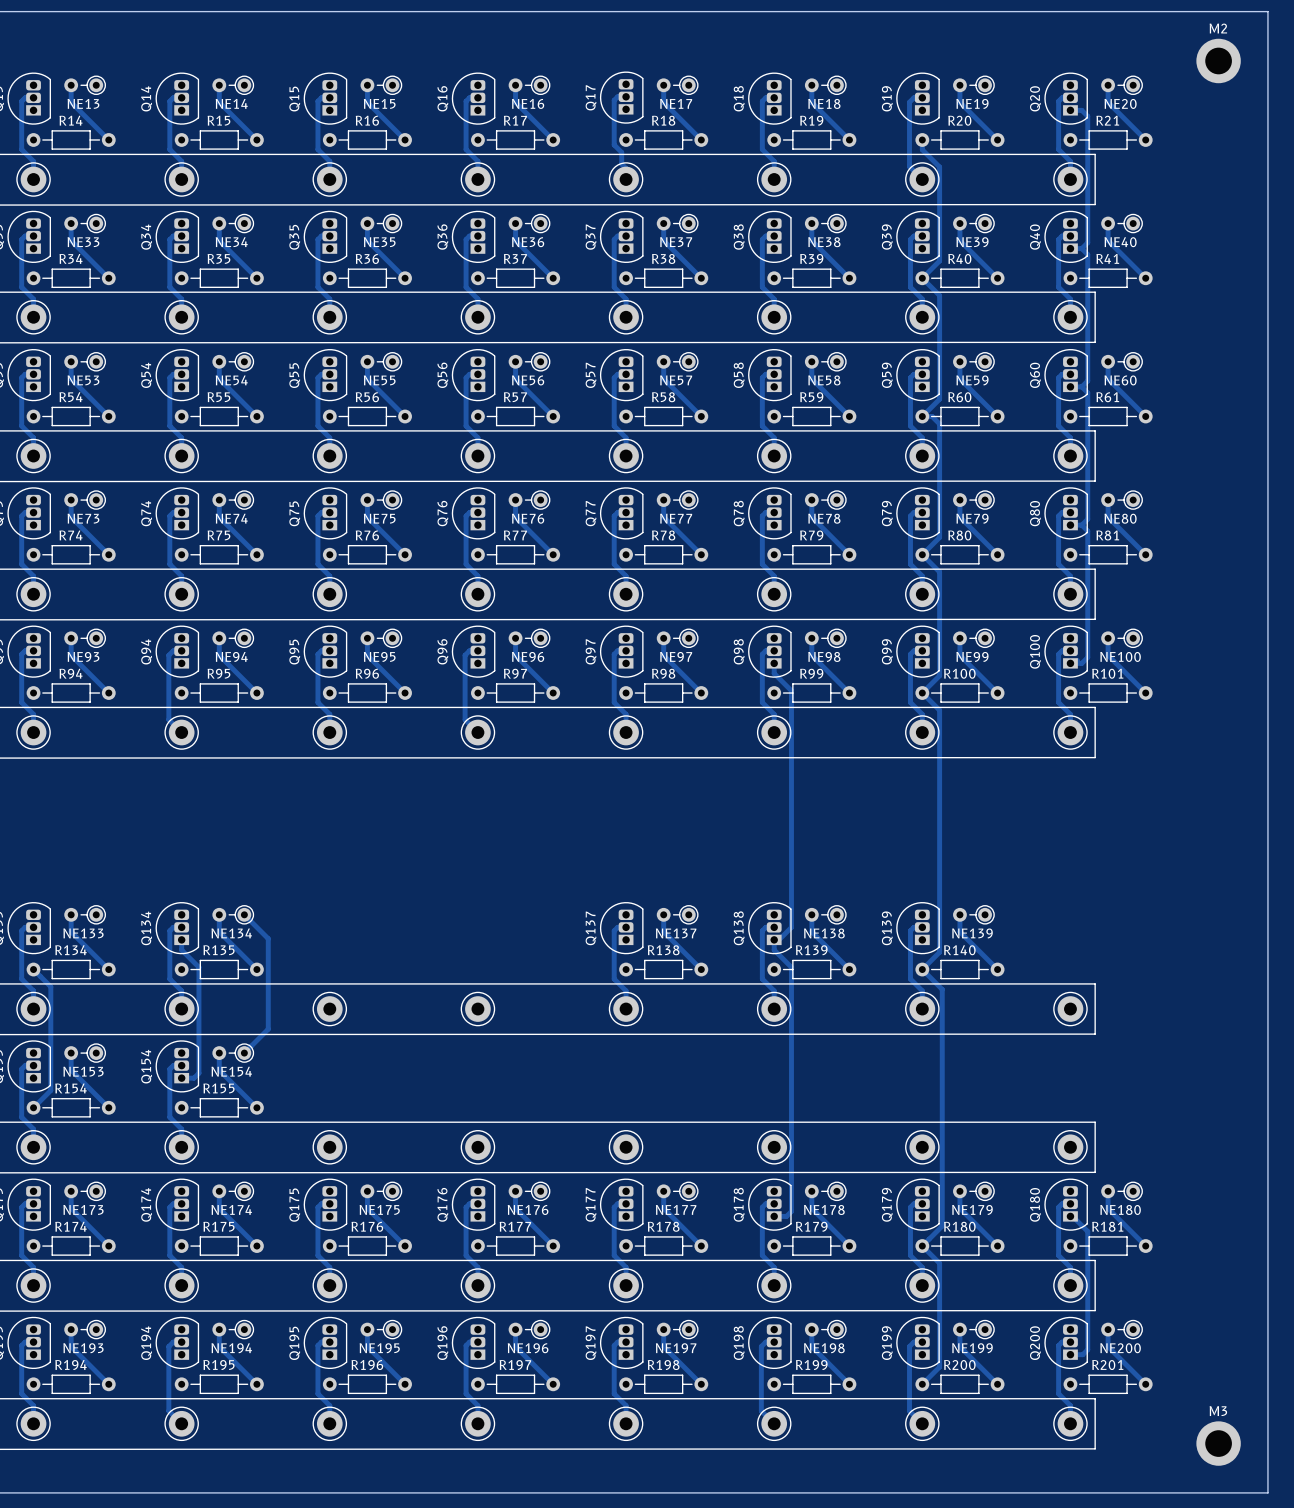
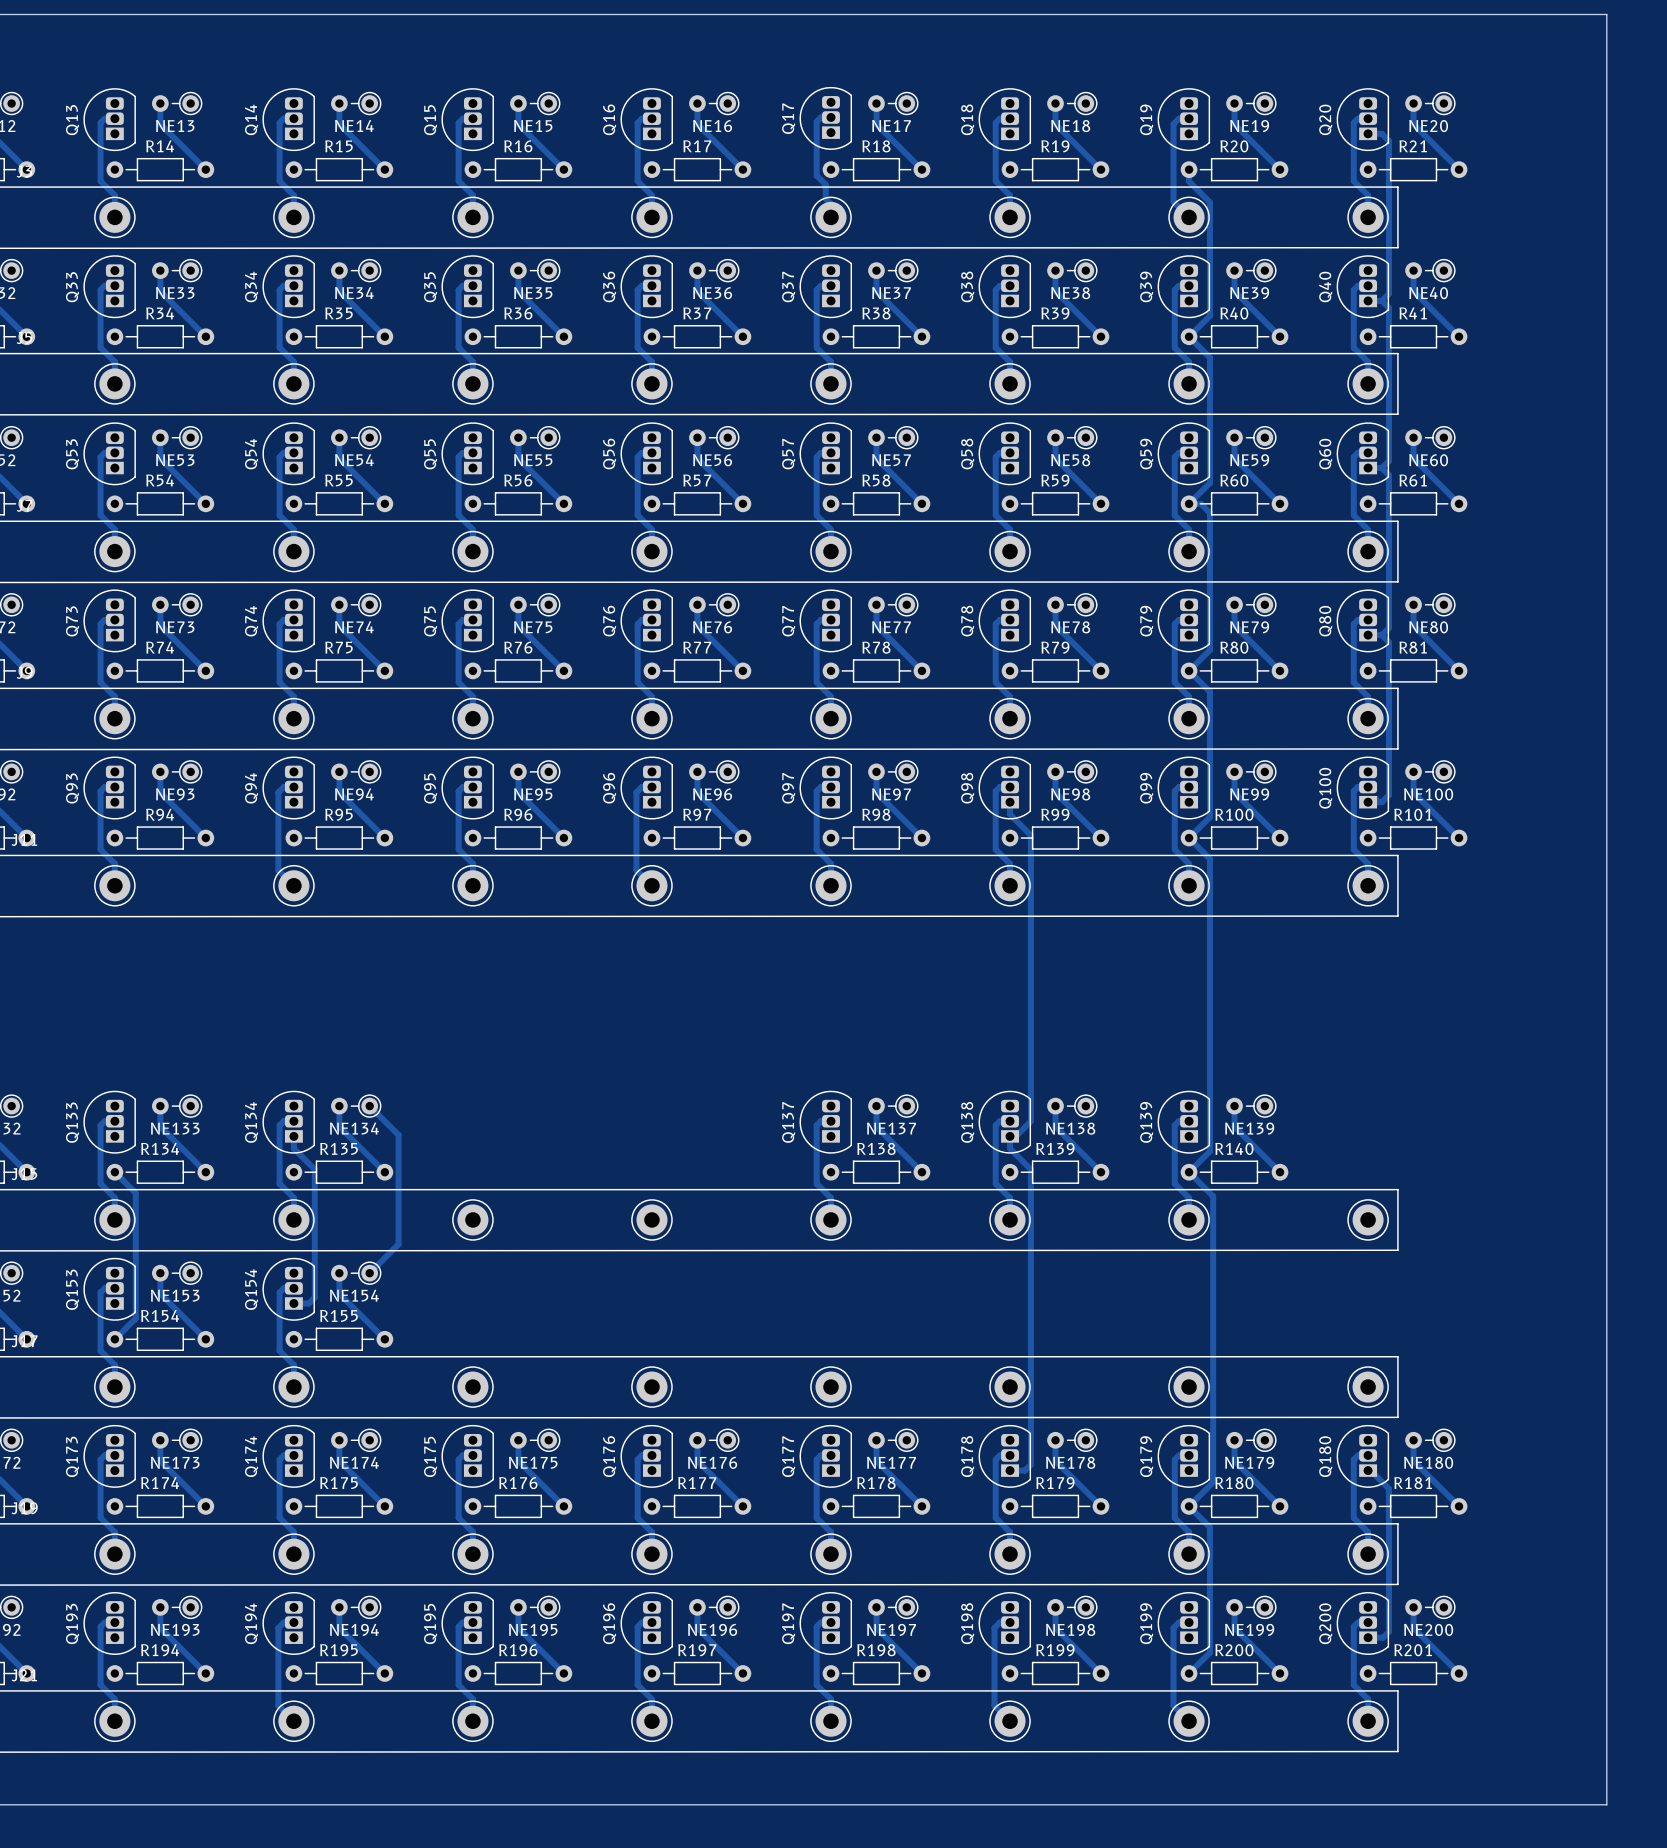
M2: (1218, 60) -> none
M3: (1218, 1443) -> none

